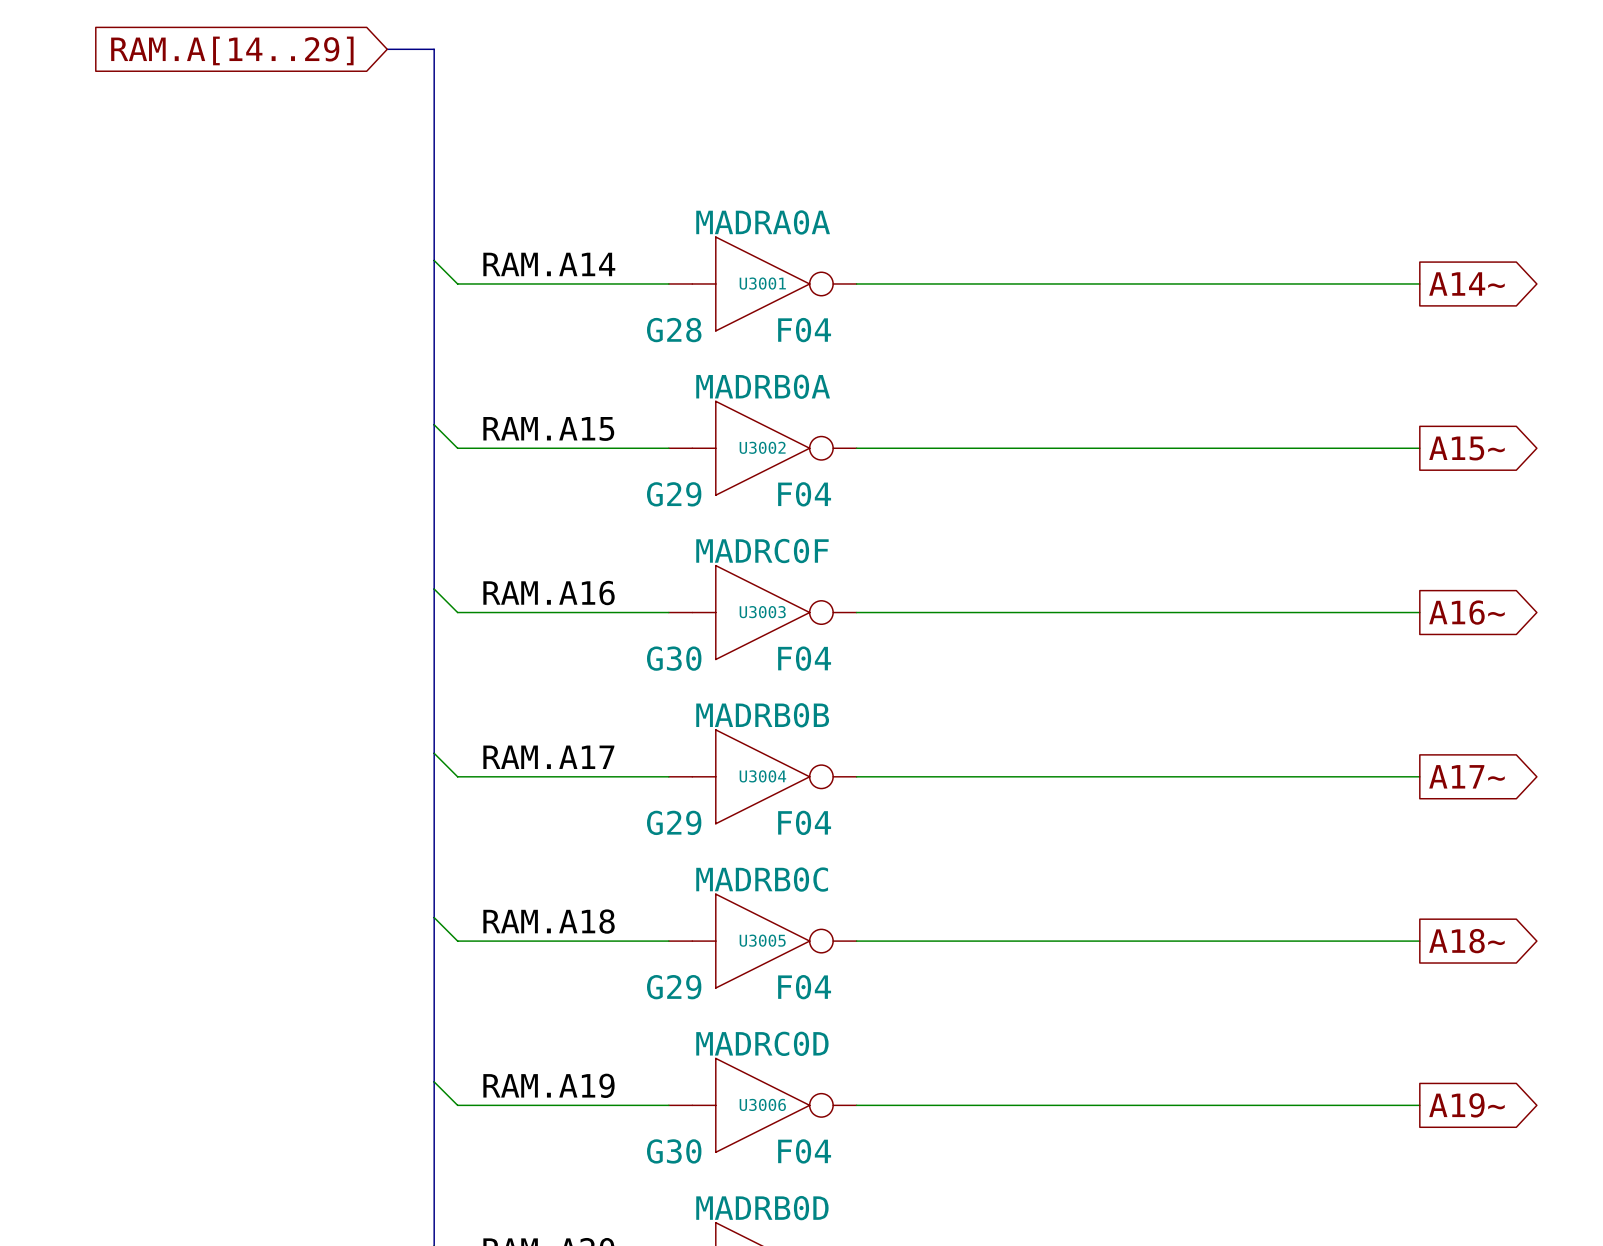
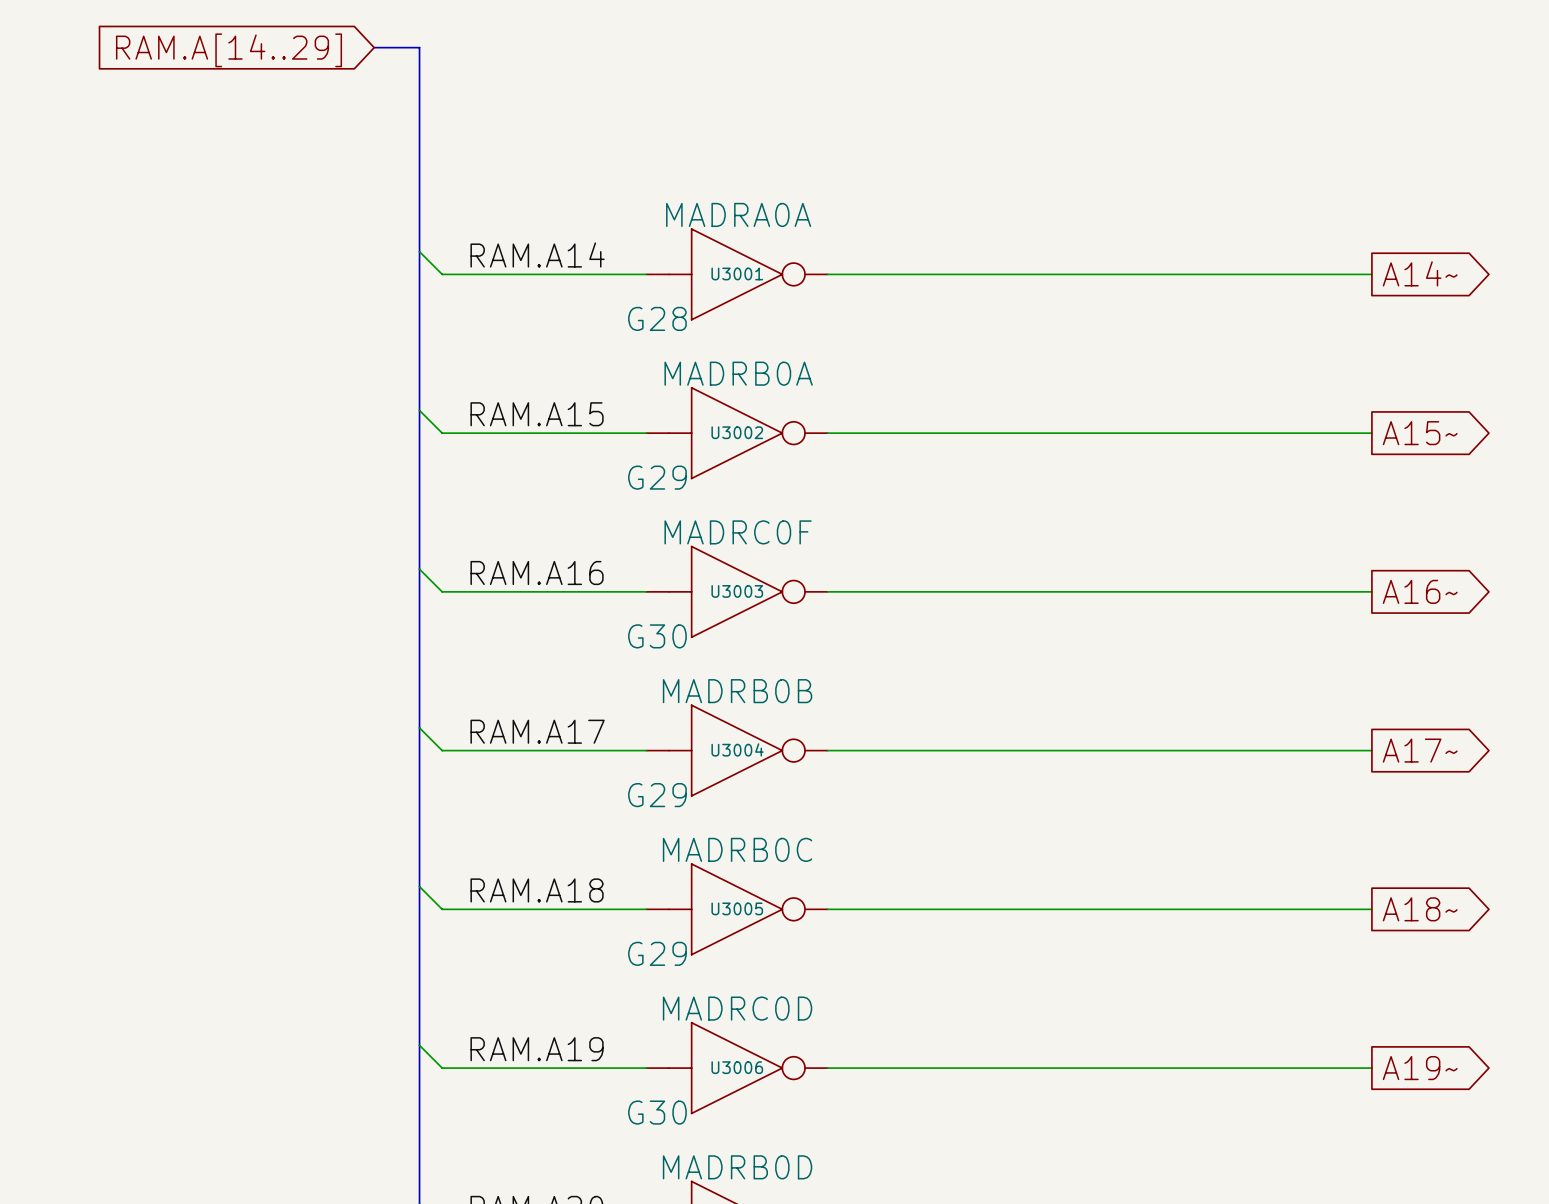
U3001 value: F04 (804, 330) -> none
U3002 value: F04 (804, 494) -> none
U3003 value: F04 (804, 658) -> none
U3004 value: F04 (804, 822) -> none
U3005 value: F04 (804, 987) -> none
U3006 value: F04 (804, 1151) -> none

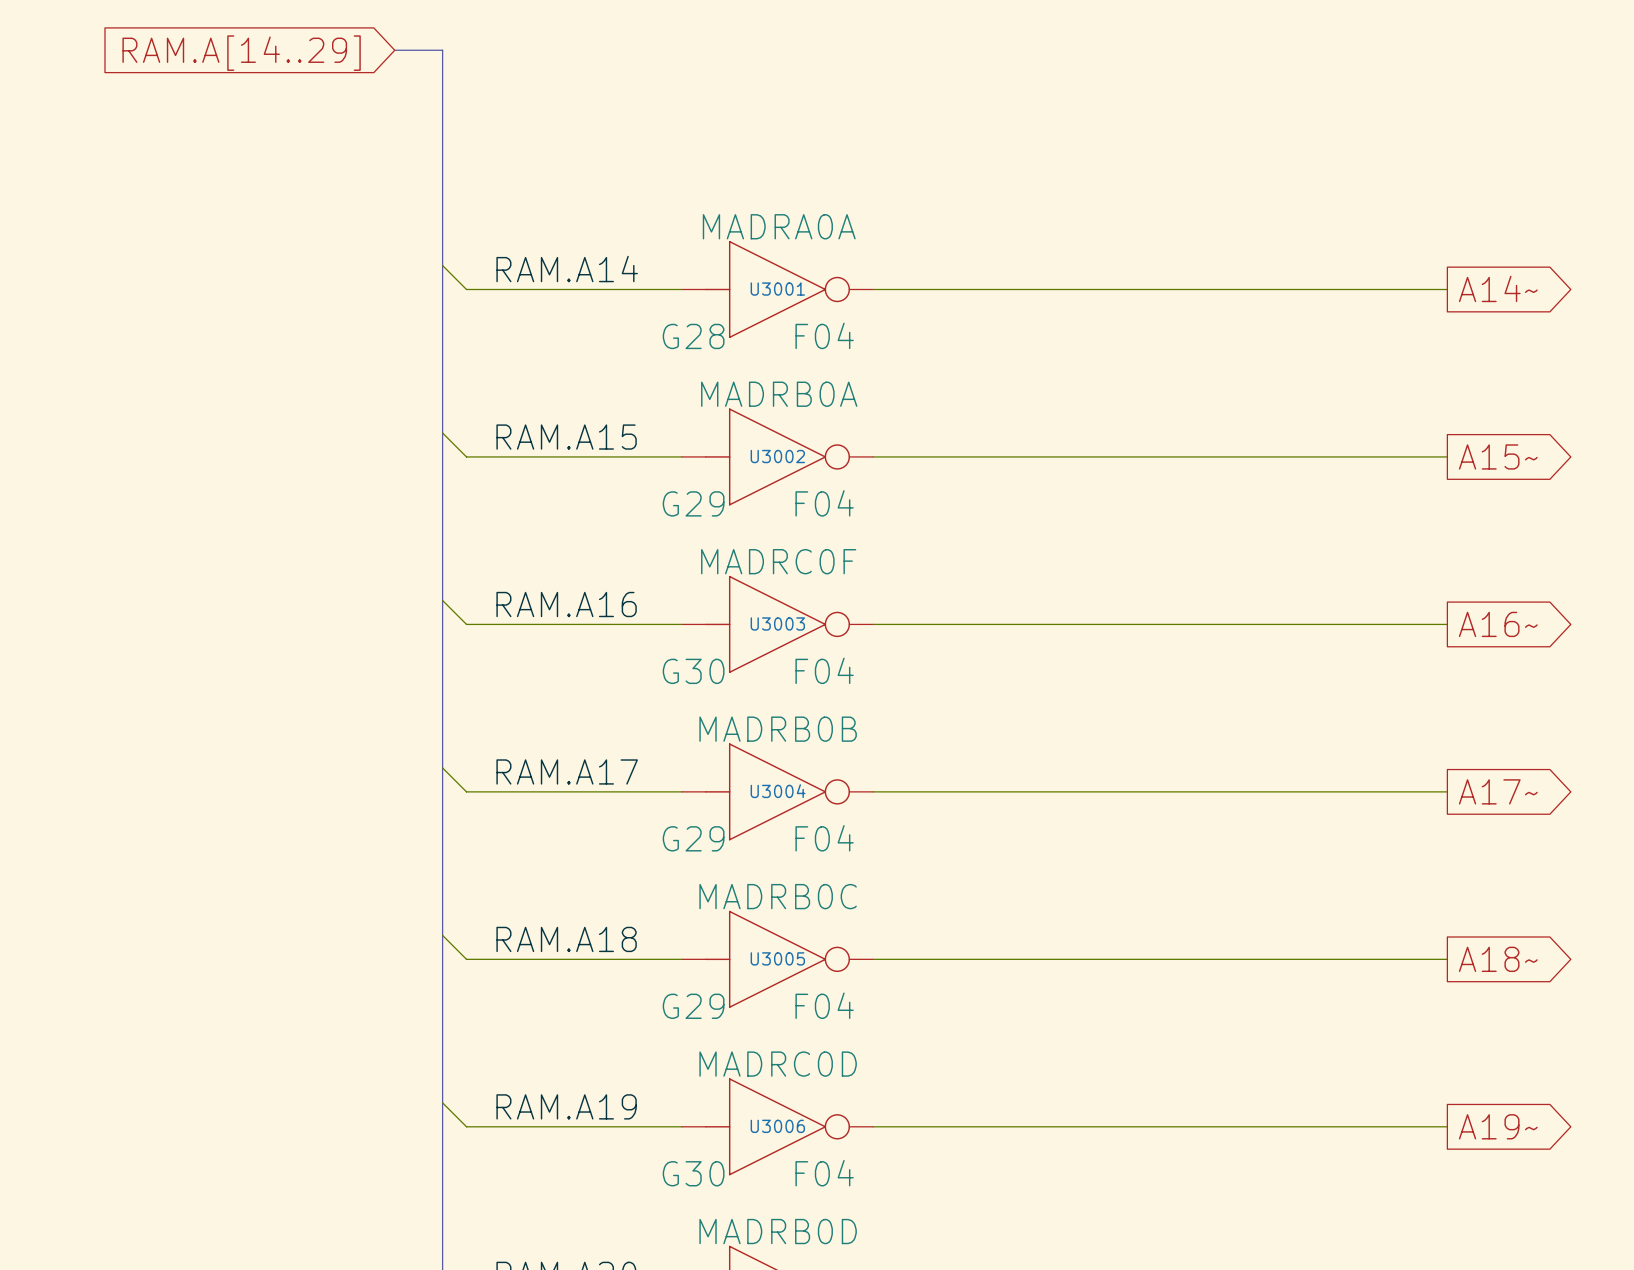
U3001 value: none -> F04 (824, 335)
U3002 value: none -> F04 (824, 503)
U3003 value: none -> F04 (824, 670)
U3004 value: none -> F04 (824, 838)
U3005 value: none -> F04 (824, 1005)
U3006 value: none -> F04 (824, 1173)

